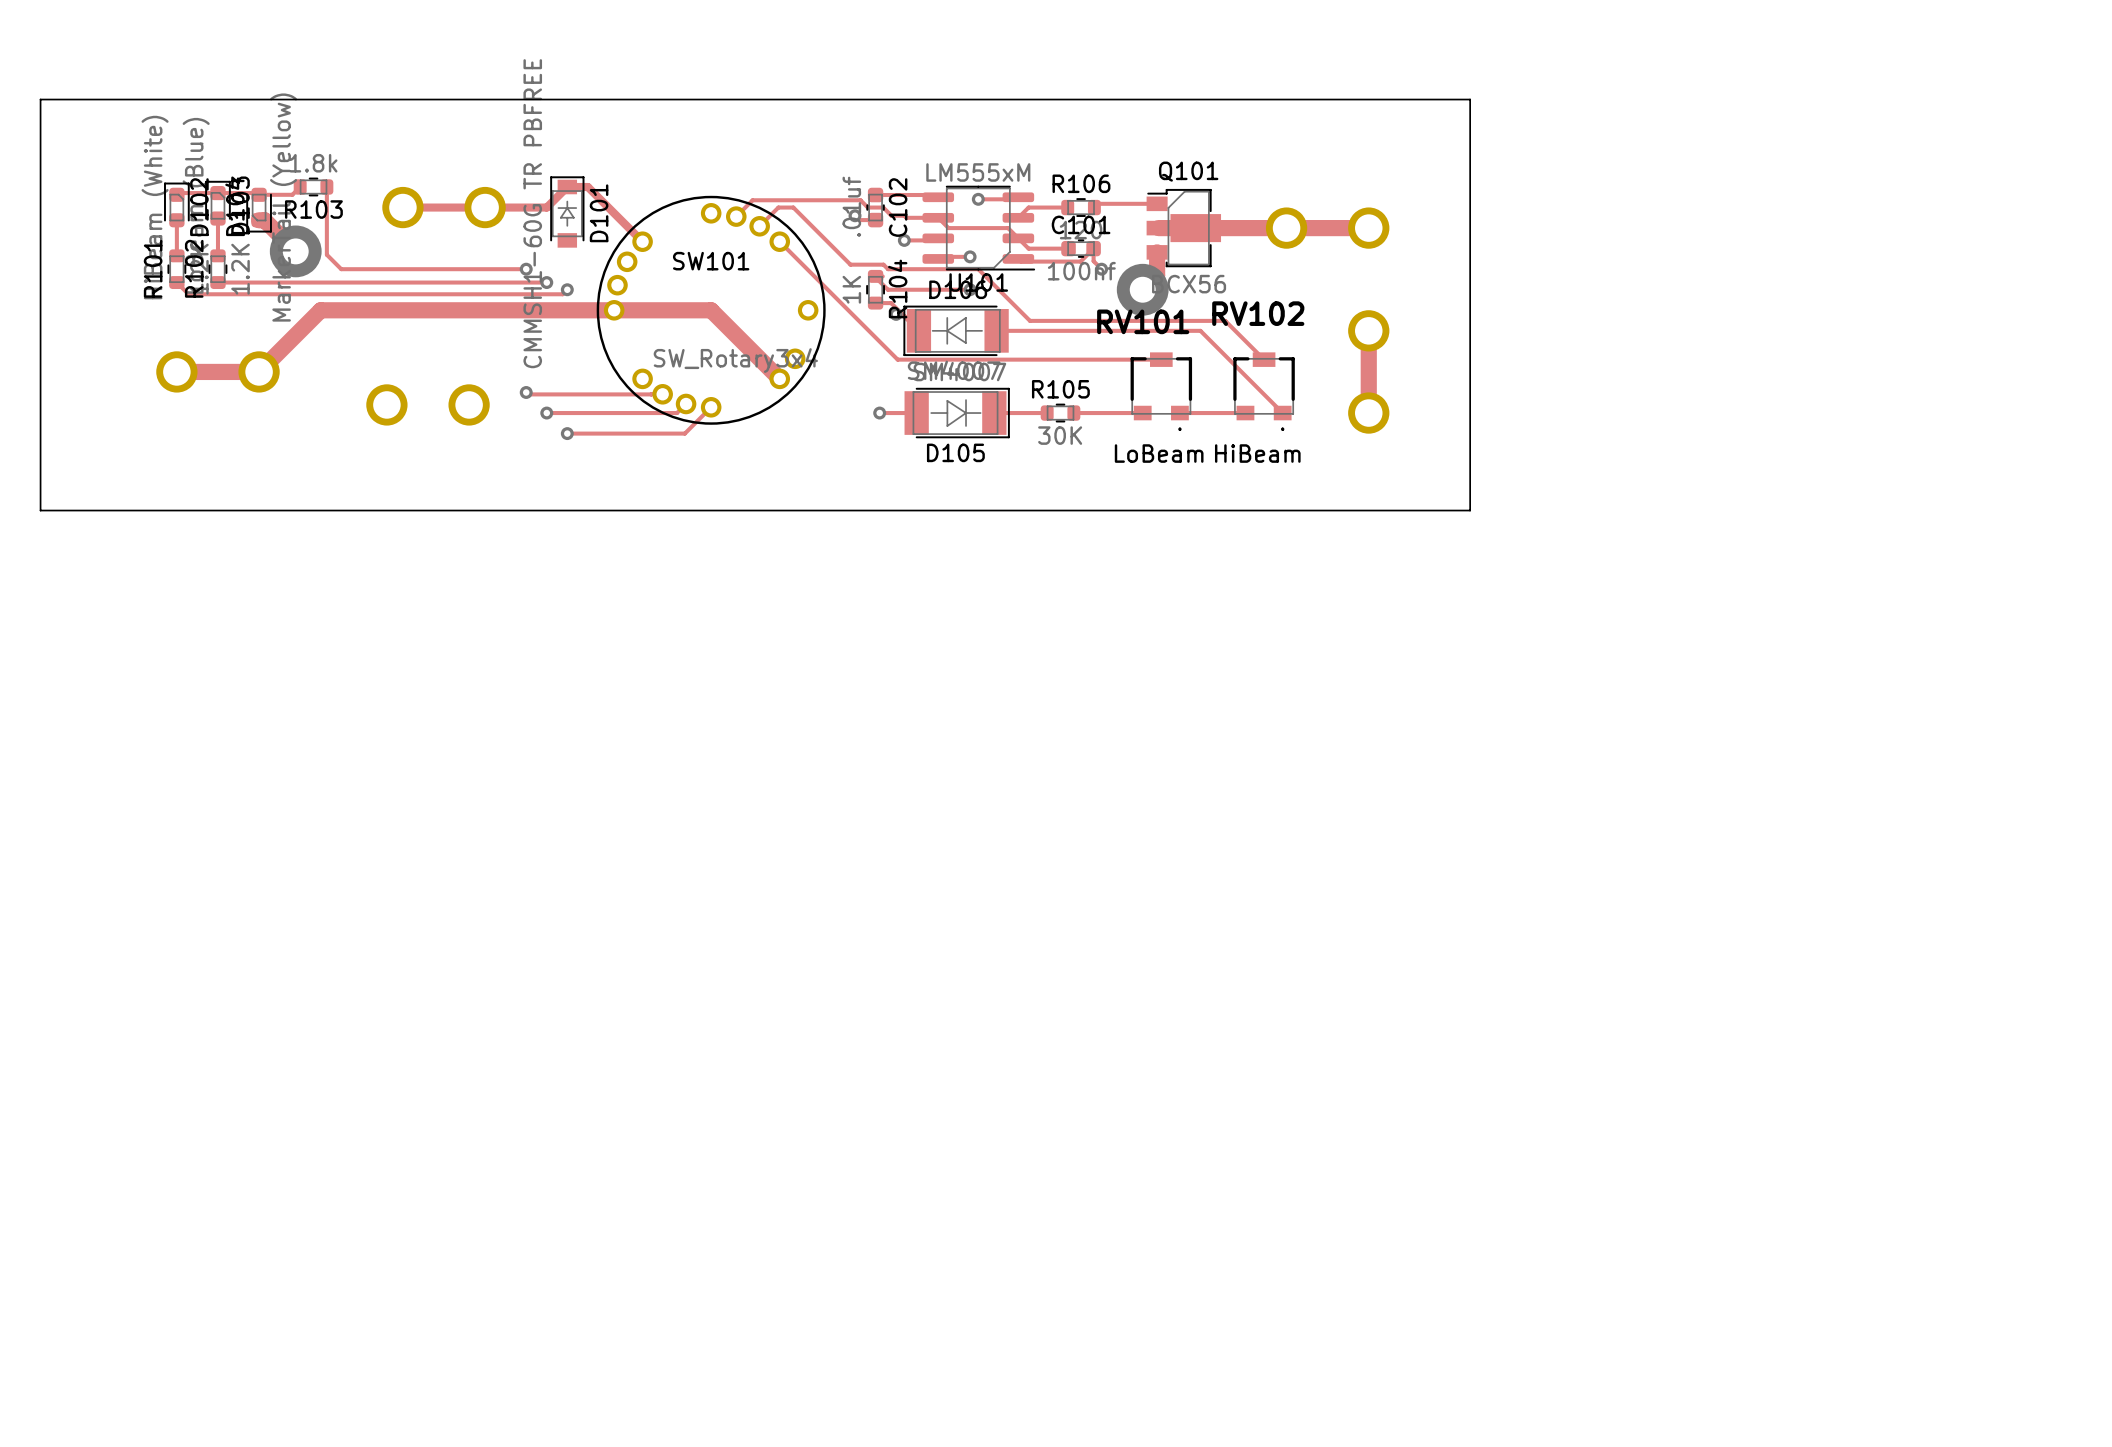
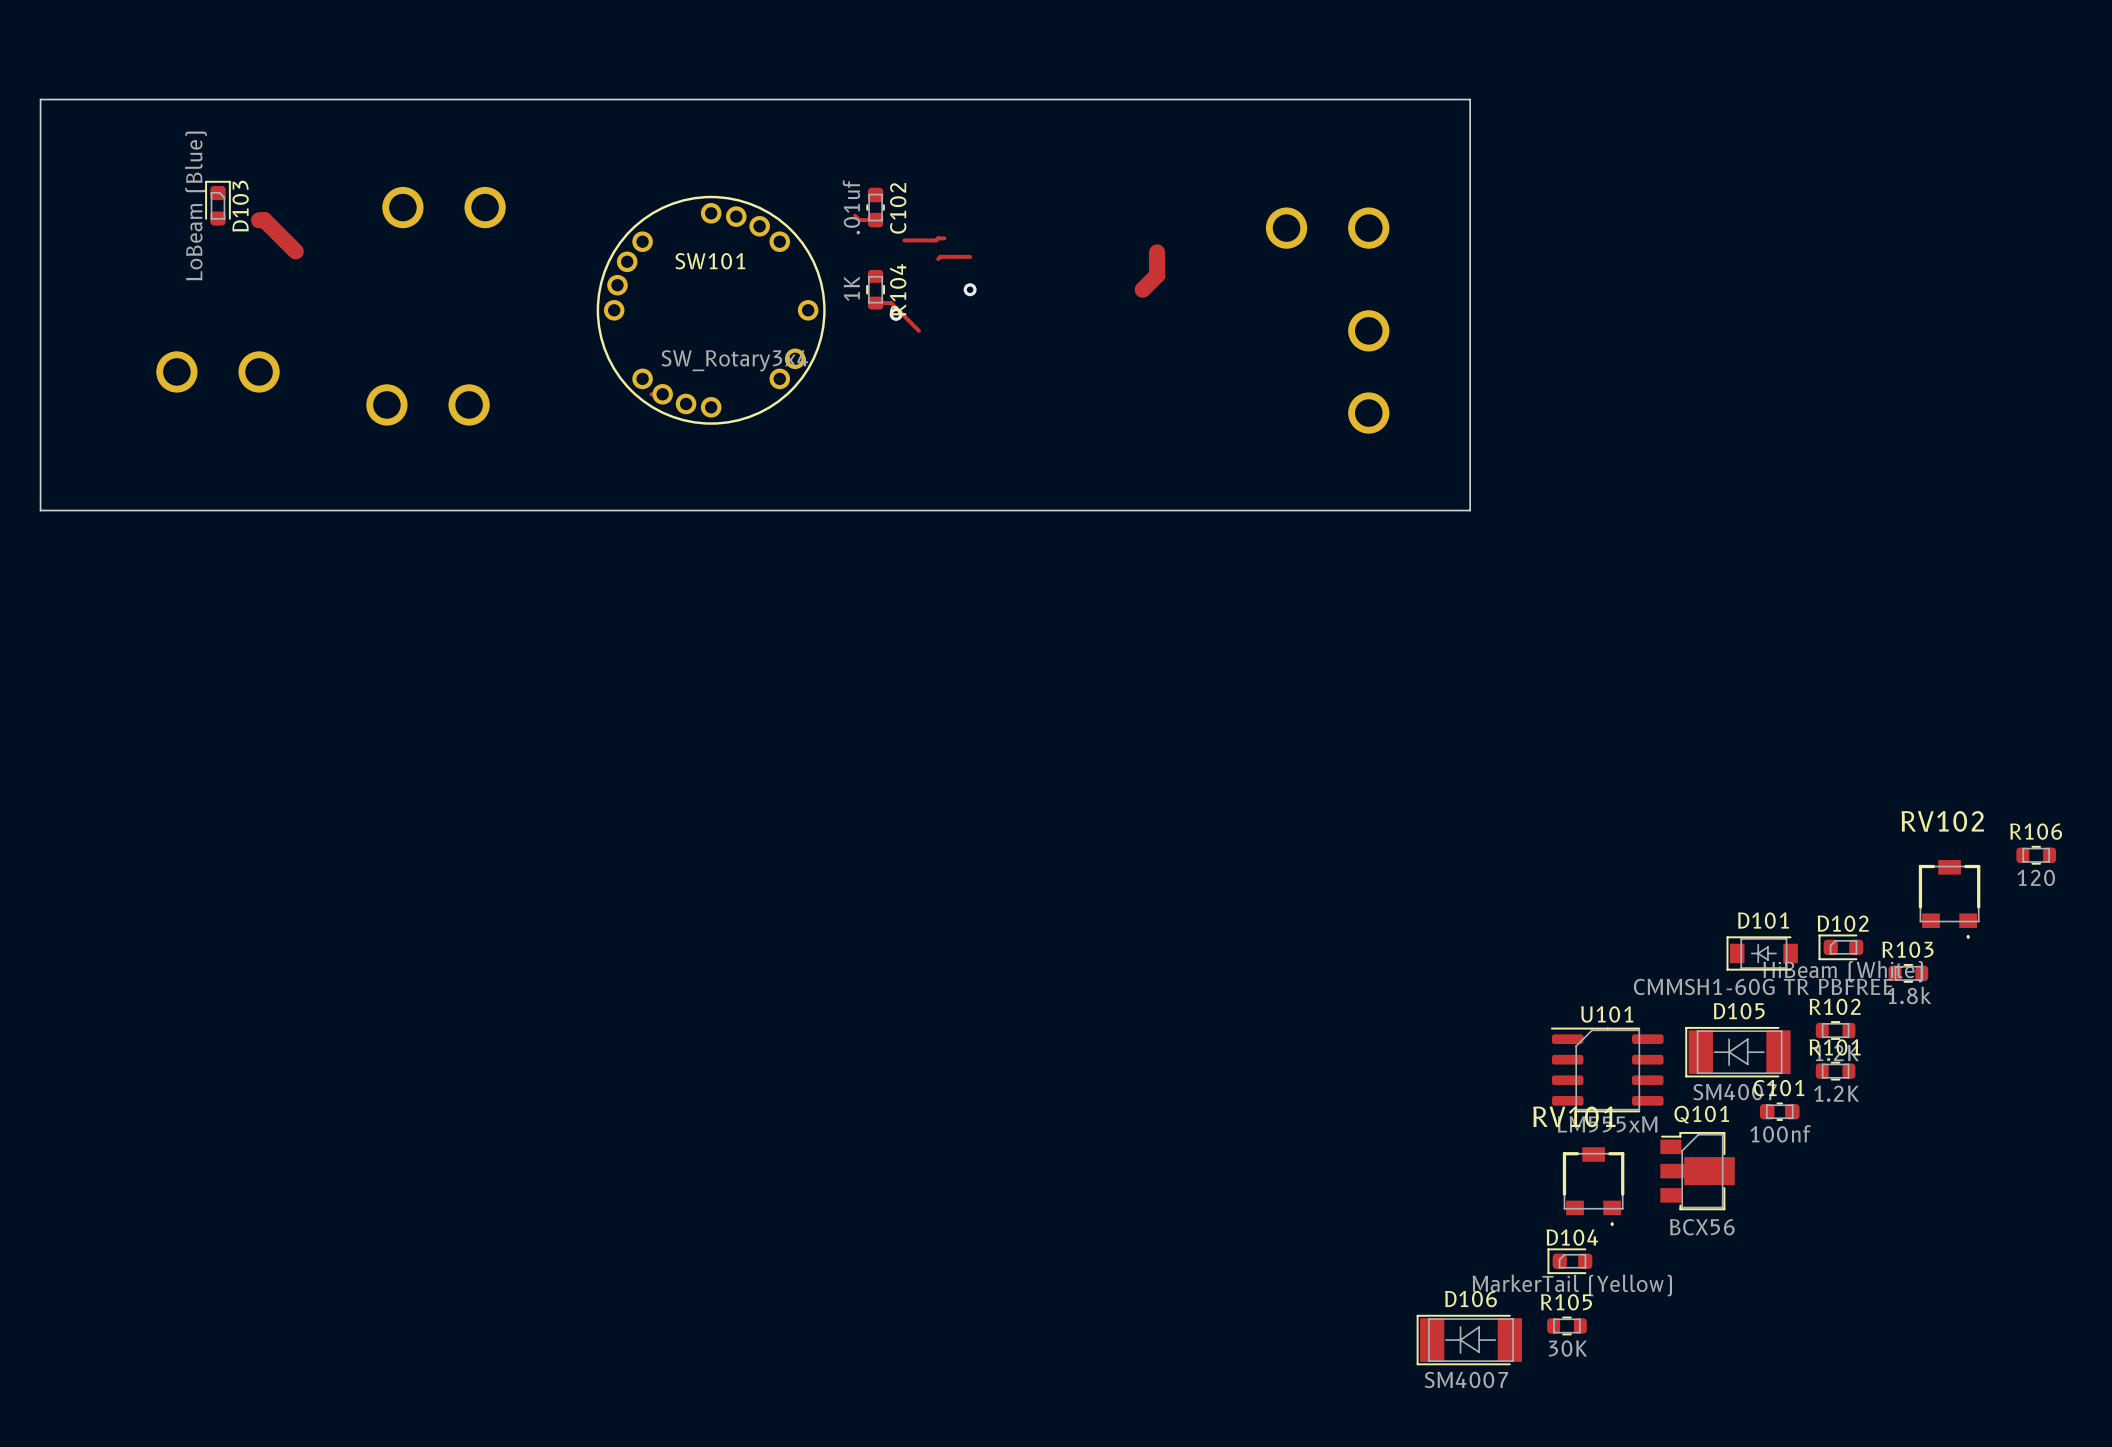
R103 value position: 1.8k (313, 163) -> 1.8k (1909, 995)
track: (300, 186) (292, 194) (259, 194) (257, 193) (178, 193) (176, 194) -> none
R103 position: (313, 186) -> (1908, 973)
track: (326, 186) (326, 254) (341, 269) (526, 269) -> none
track: (875, 195) (936, 195) (938, 197) -> none
track: (1018, 197) (1016, 199) (978, 199) -> none
via: (978, 199) -> none
track: (1157, 203) (1098, 203) (1094, 207) -> none
D102 rotation: 0° (176, 204) -> 90° counterclockwise (1840, 947)
D102 position: (176, 204) -> (1840, 947)
track: (402, 207) (546, 207) (567, 186) (587, 186) (642, 241) -> none
track: (1067, 207) (1028, 207) (1018, 217) -> none
R106 position: (1081, 207) -> (2036, 855)
R103 name position: R103 (313, 209) -> R103 (1907, 949)
D104 rotation: 0° (259, 210) -> 90° clockwise (1569, 1261)
D104 position: (259, 210) -> (1569, 1261)
D101 rotation: 0° (567, 211) -> 90° counterclockwise (1762, 953)
D101 position: (567, 211) -> (1762, 953)
via: (855, 215) -> none
track: (736, 216) (752, 200) (860, 200) (867, 207) (883, 207) (891, 215) (938, 217) (948, 228) (1008, 228) (1028, 248) (1068, 248) -> none
track: (217, 218) (217, 255) -> none
track: (176, 220) (176, 255) -> none
track: (759, 226) (778, 207) (793, 207) (850, 264) (883, 264) (888, 269) (978, 269) (1030, 320) (1225, 320) (1264, 359) -> none
U101 rotation: 0° (978, 228) -> 180° (1607, 1069)
U101 position: (978, 228) -> (1607, 1069)
track: (1158, 228) (1368, 228) -> none
Q101 position: (1183, 228) -> (1697, 1171)
via: (904, 240) -> none
track: (779, 241) (897, 359) (1161, 359) -> none
C101 position: (1081, 248) -> (1779, 1111)
via: (295, 251) -> none
via: (970, 256) -> none
track: (1018, 258) (1021, 261) (1080, 261) (1093, 248) (1093, 261) (1101, 269) -> none
R101 rotation: 0° (176, 269) -> 90° clockwise (1835, 1071)
R101 position: (176, 269) -> (1835, 1071)
R102 rotation: 0° (217, 269) -> 90° clockwise (1835, 1030)
R102 position: (217, 269) -> (1835, 1030)
via: (526, 269) -> none
via: (1101, 269) -> none
track: (882, 276) (875, 277) (887, 289) (970, 289) -> none
track: (176, 282) (188, 294) (562, 294) (567, 289) -> none
track: (217, 282) (546, 282) -> none
via: (546, 282) -> none
via: (567, 289) -> none
via: (1142, 289) -> none
D106 position: (956, 330) -> (1469, 1340)
track: (996, 330) (1200, 330) (1282, 413) -> none
track: (1368, 330) (1368, 413) -> none
track: (176, 371) (259, 371) (320, 310) (711, 310) (779, 378) -> none
RV101 position: (1161, 391) -> (1593, 1186)
RV102 position: (1264, 391) -> (1949, 899)
track: (526, 392) (528, 394) (651, 394) -> none
via: (526, 392) -> none
track: (686, 403) (677, 413) (546, 413) -> none
track: (711, 407) (684, 433) (567, 433) -> none
via: (546, 413) -> none
track: (879, 413) (916, 413) -> none
via: (879, 413) -> none
D105 rotation: 0° (957, 413) -> 180° (1737, 1052)
D105 position: (957, 413) -> (1737, 1052)
track: (994, 413) (1047, 413) -> none
R105 position: (1060, 413) -> (1566, 1325)
track: (1073, 413) (1142, 413) -> none
track: (1179, 413) (1245, 413) -> none
via: (567, 433) -> none
text: LoBeam (1159, 453) -> none
text: HiBeam (1257, 453) -> none

